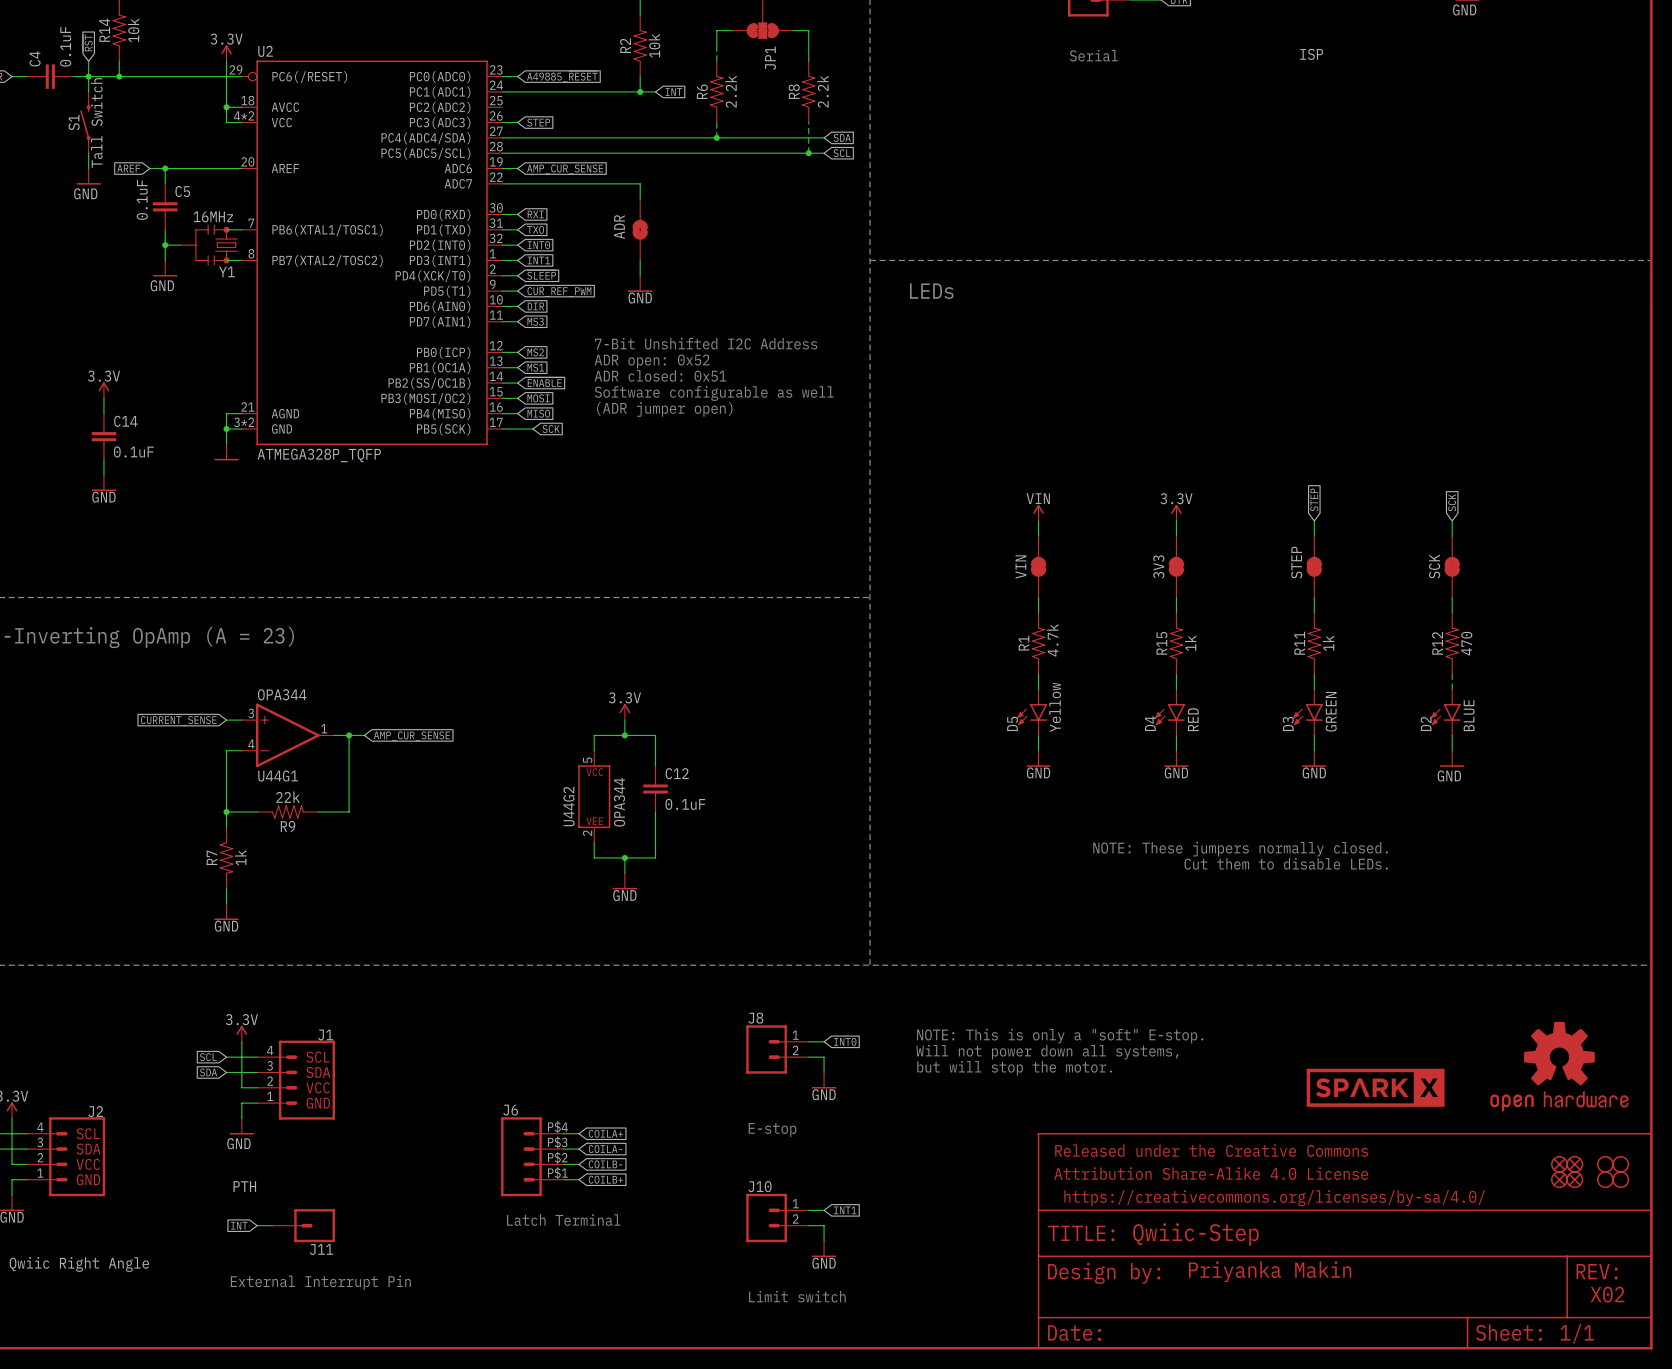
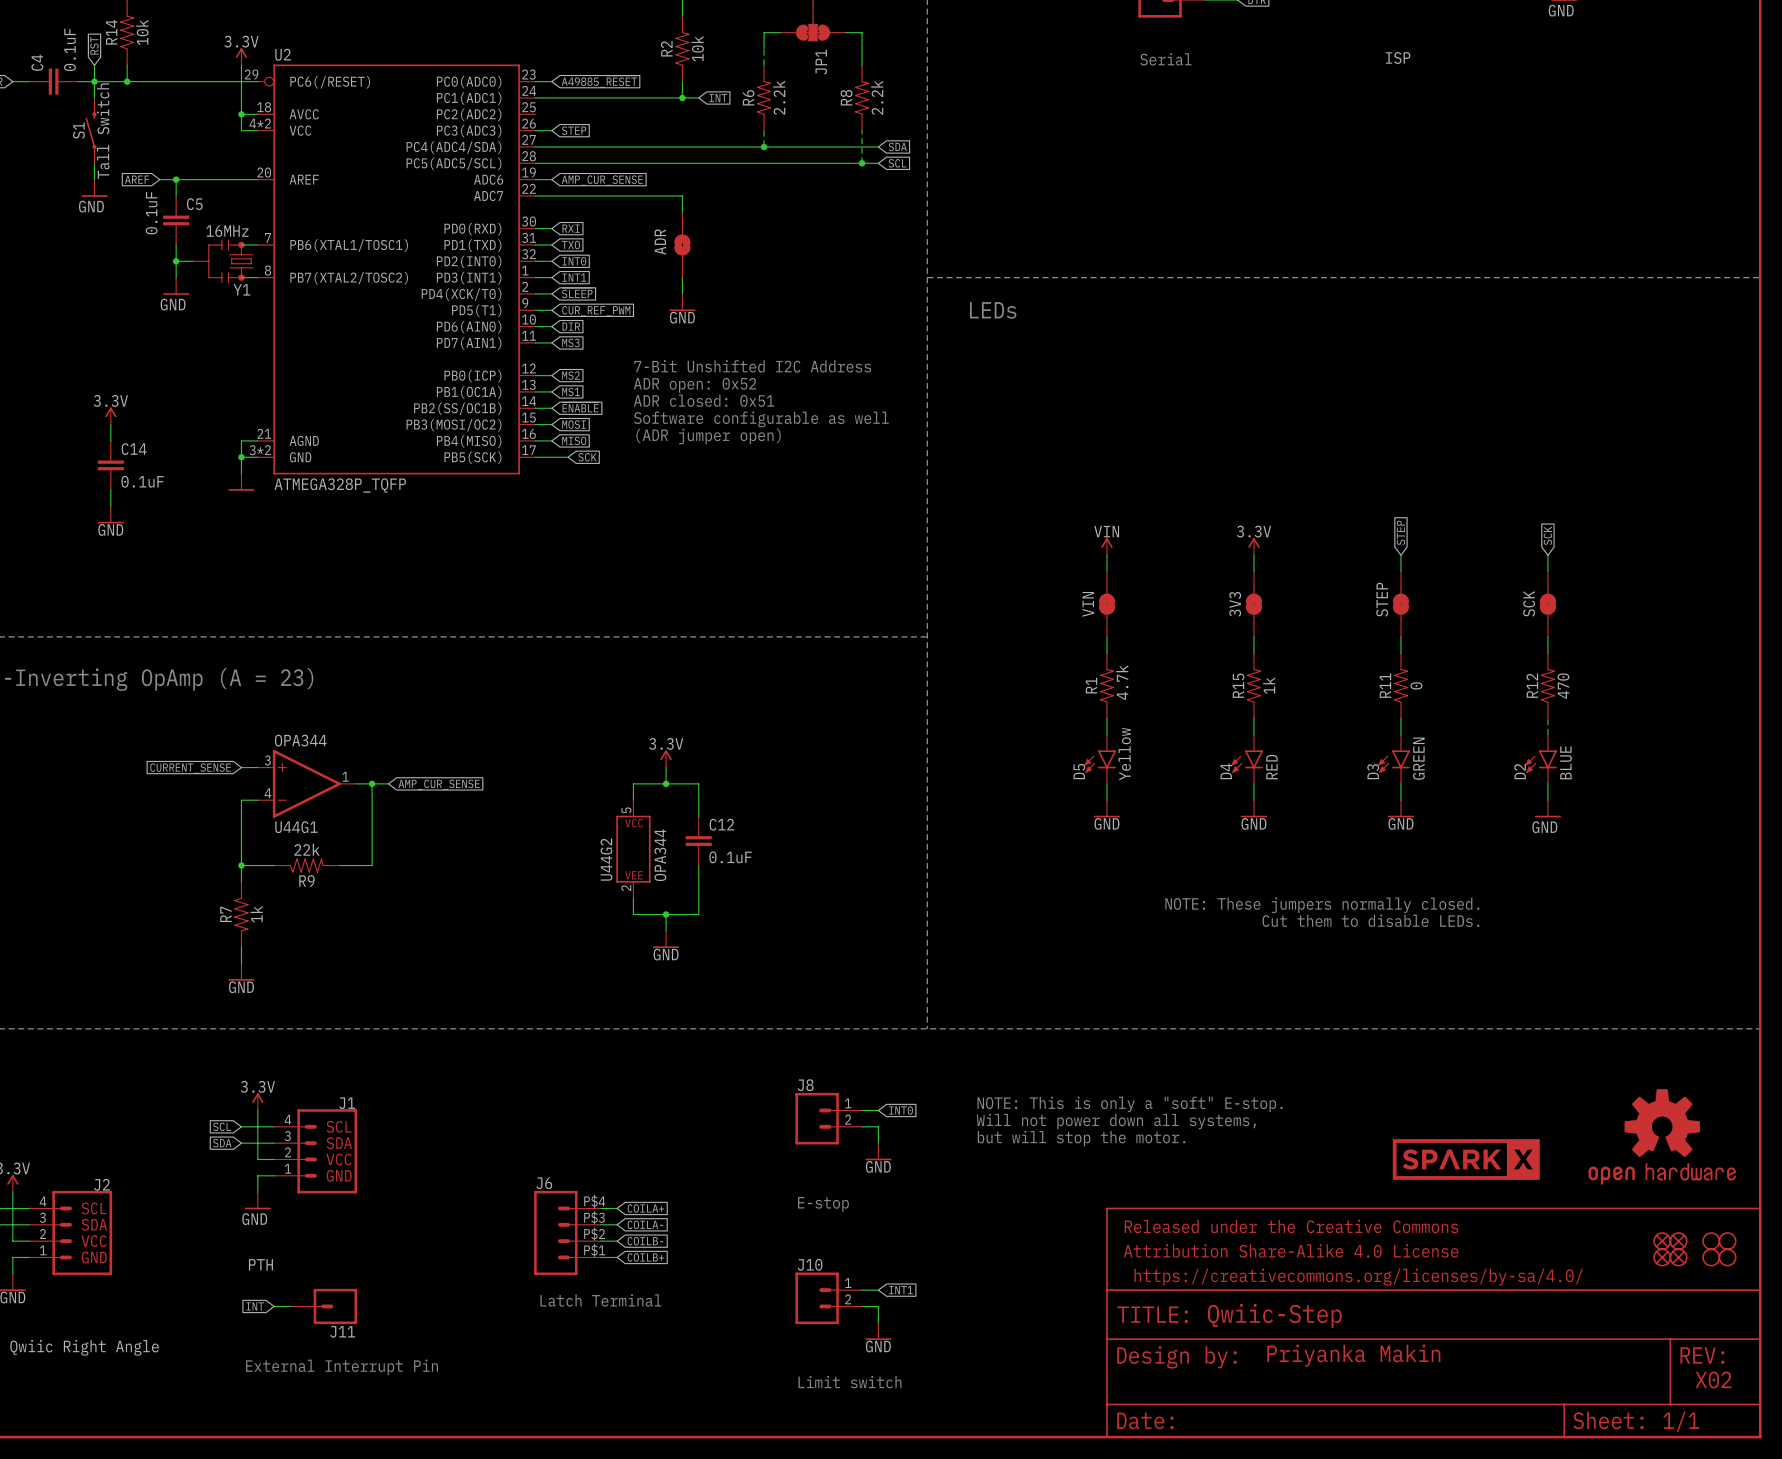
R11 value: 1k (1328, 643) -> 0 (1416, 685)

